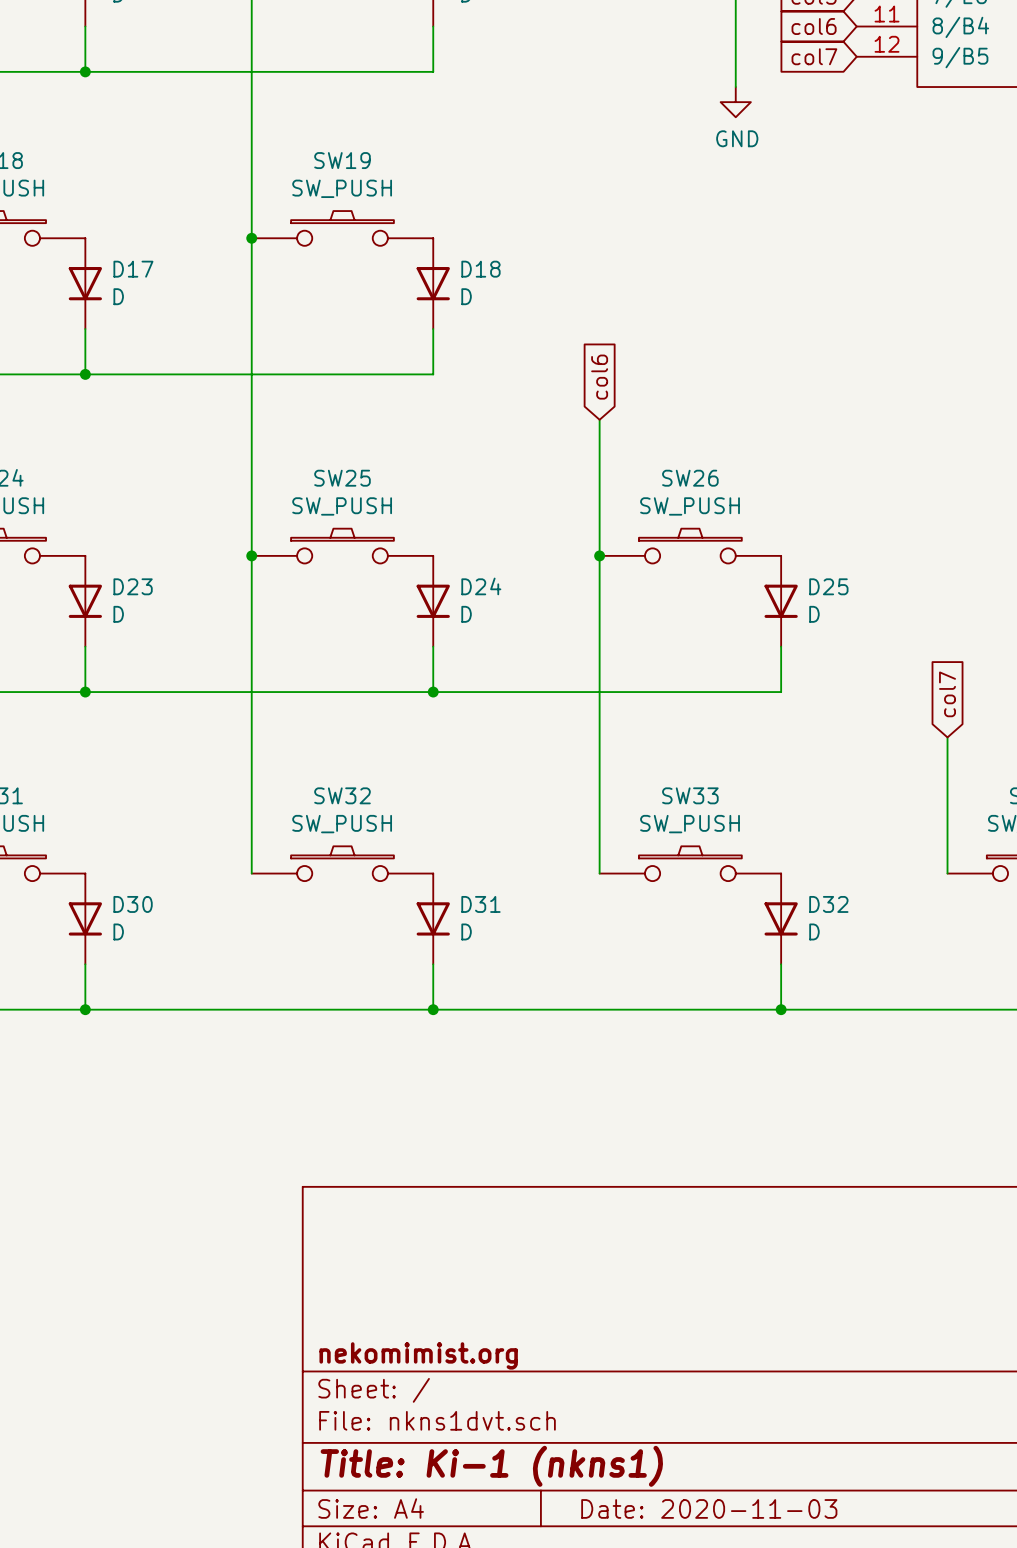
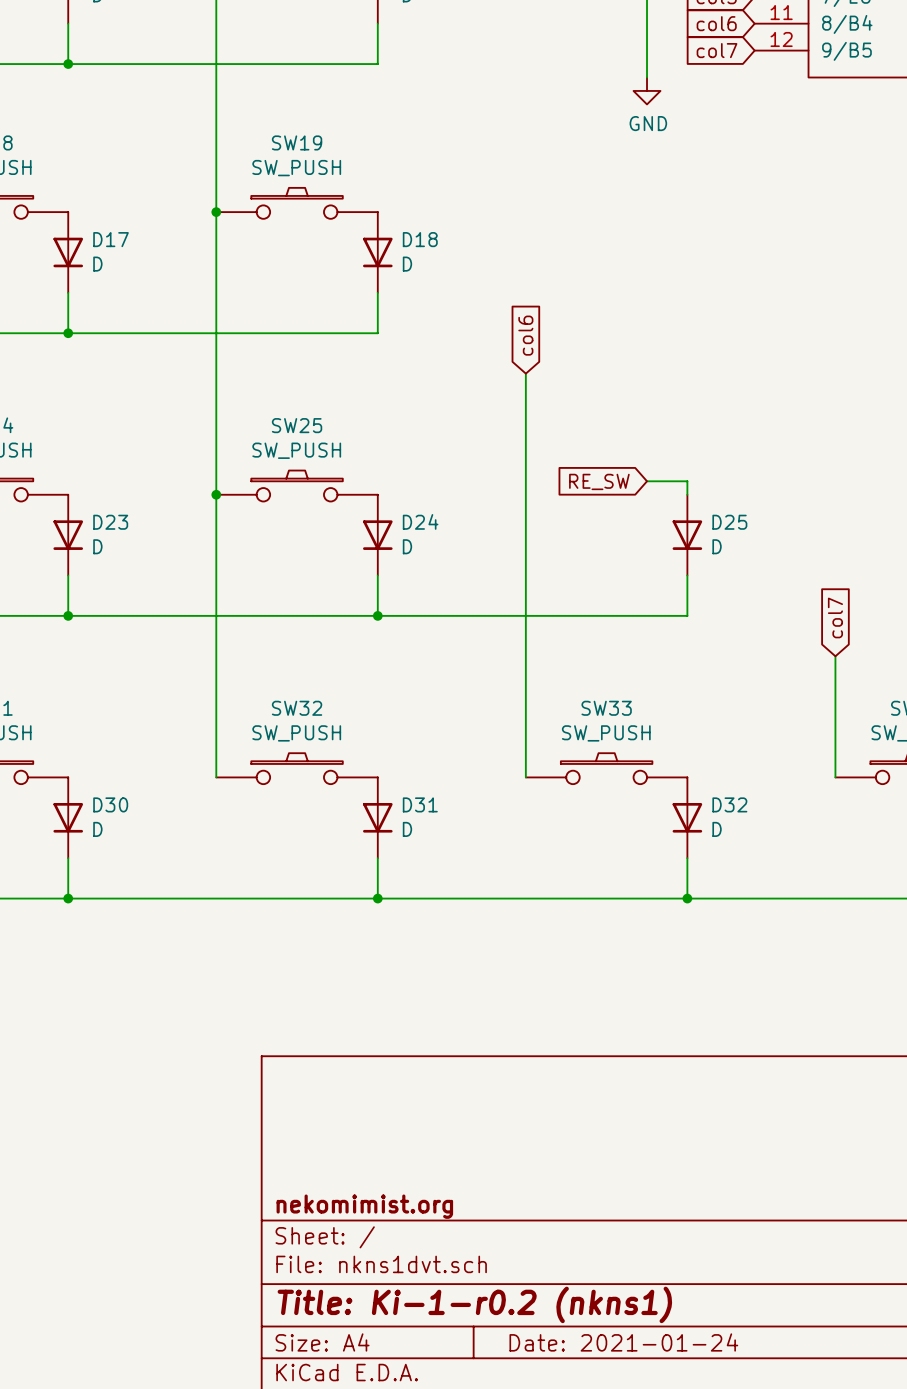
wire: none -> (647, 481) (687, 481) (687, 494)
global label: none -> RE_SW (599, 481)
SW26: SW_PUSH (690, 546) -> none
junction: (599, 555) -> none
title block: Title: Ki-1 (nkns1) (491, 1466) -> Title: Ki-1-r0.2 (nkns1) (474, 1304)
title block: Date: 2020-11-03 (709, 1508) -> Date: 2021-01-24 (623, 1342)

